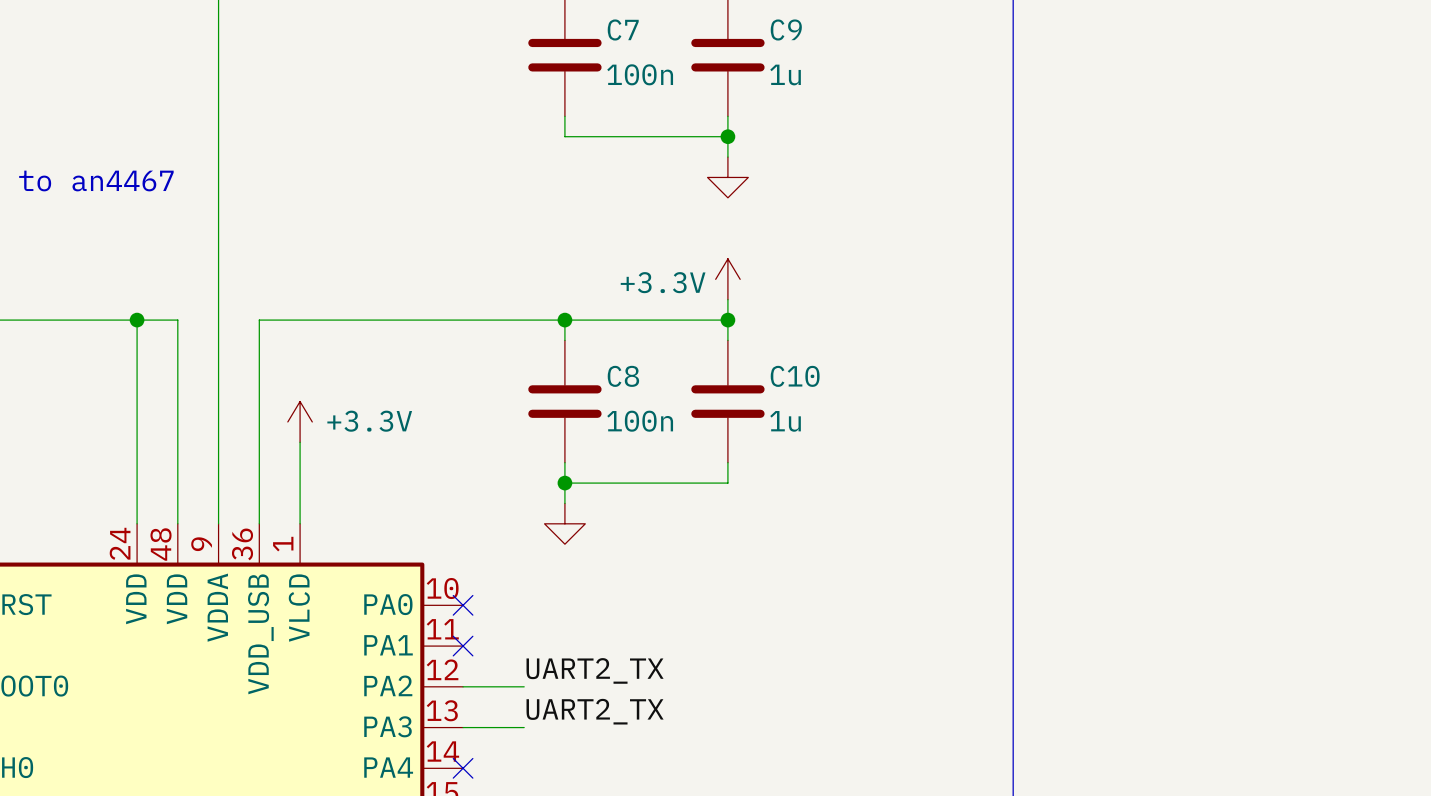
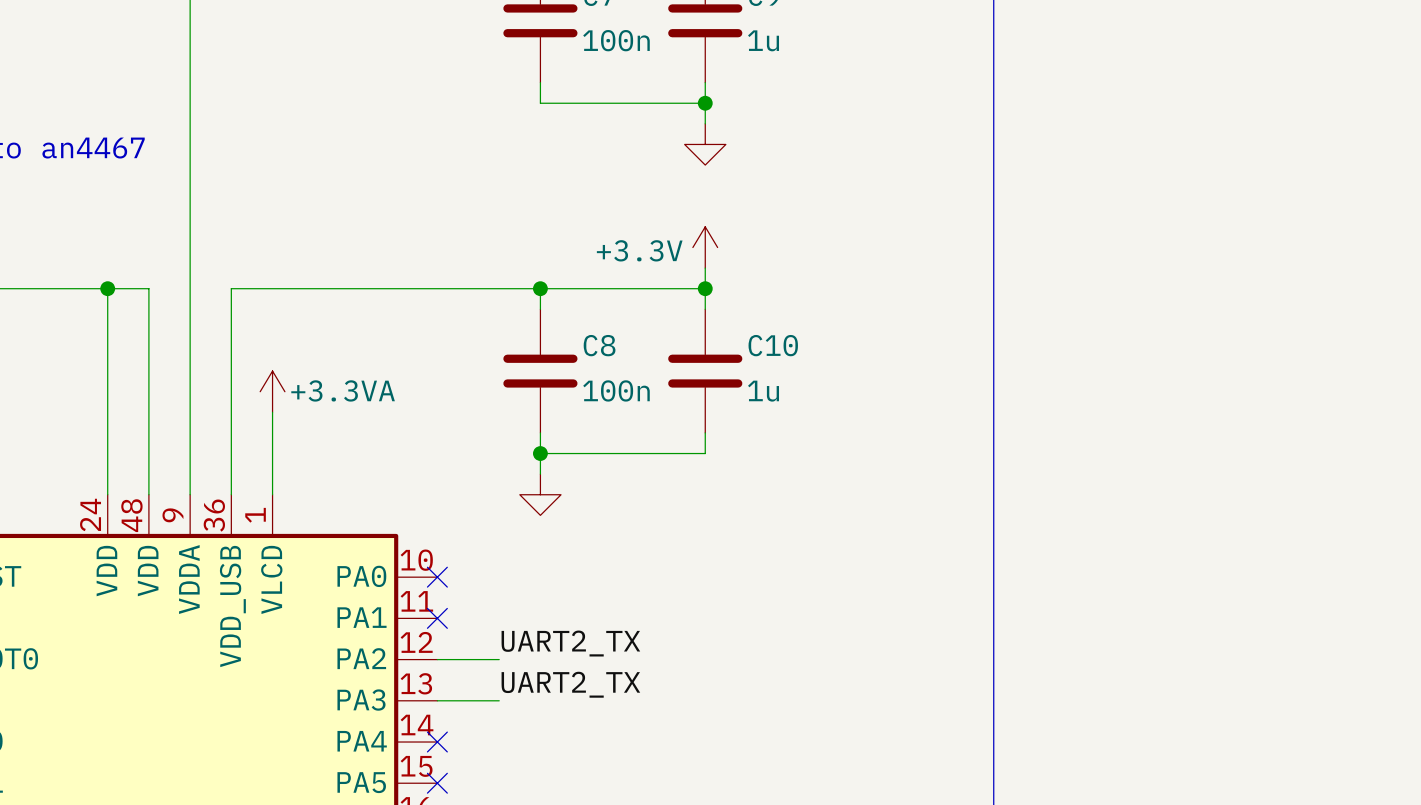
power symbol: +3.3V (300, 421) -> +3.3VA (272, 391)

